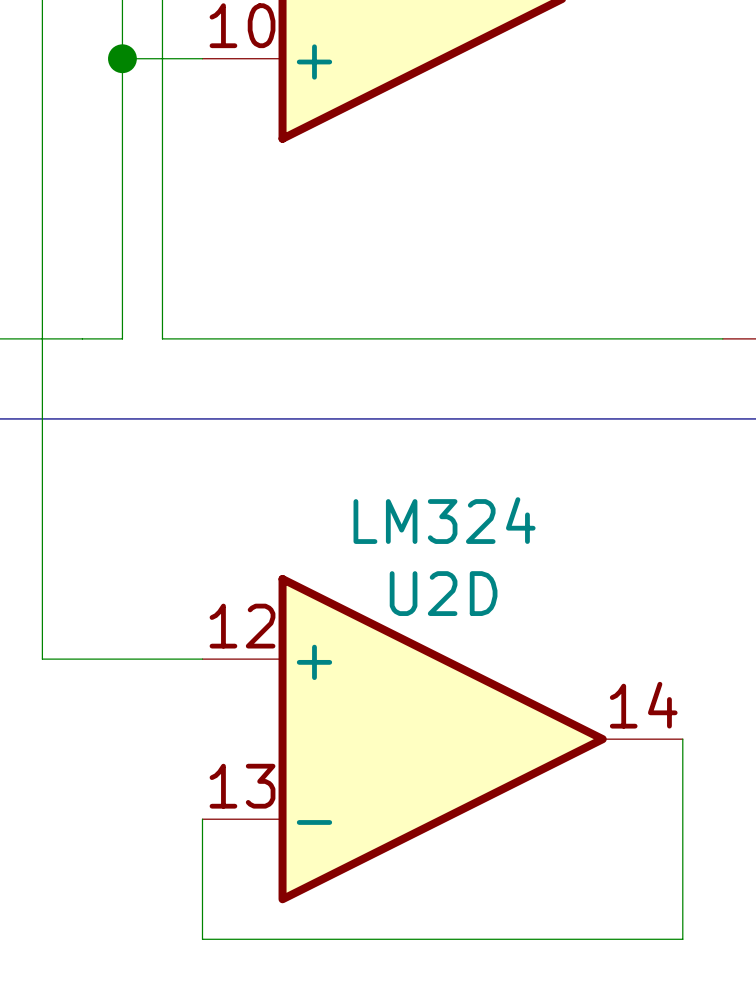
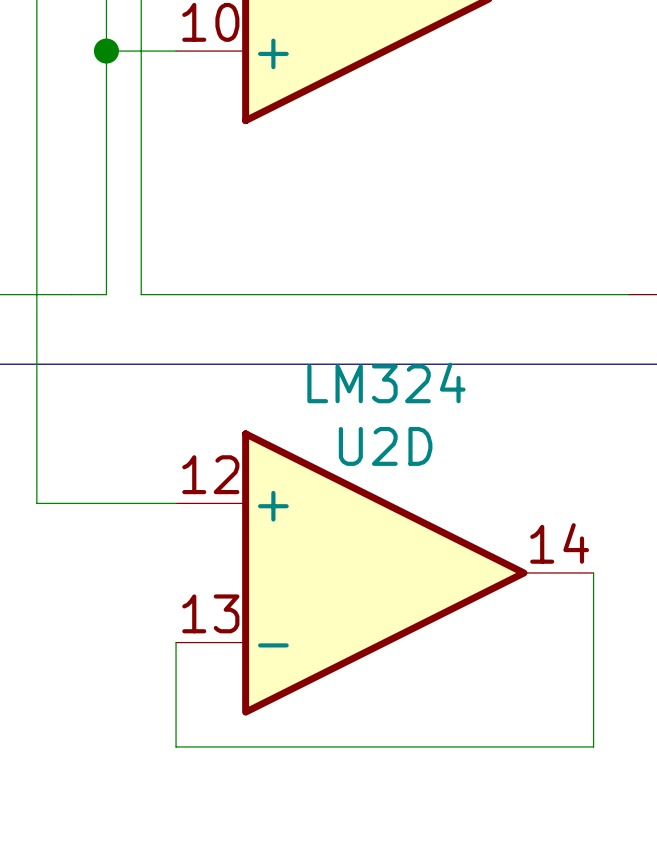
wire: (42, 579) (42, 659) (202, 659) -> (36, 503) (176, 503)
wire: none -> (593, 572) (593, 642)
wire: none -> (176, 642) (176, 712)
U2D position: (442, 739) -> (384, 572)
wire: (202, 859) (202, 939) (682, 939) (682, 859) -> (176, 746) (593, 746)

